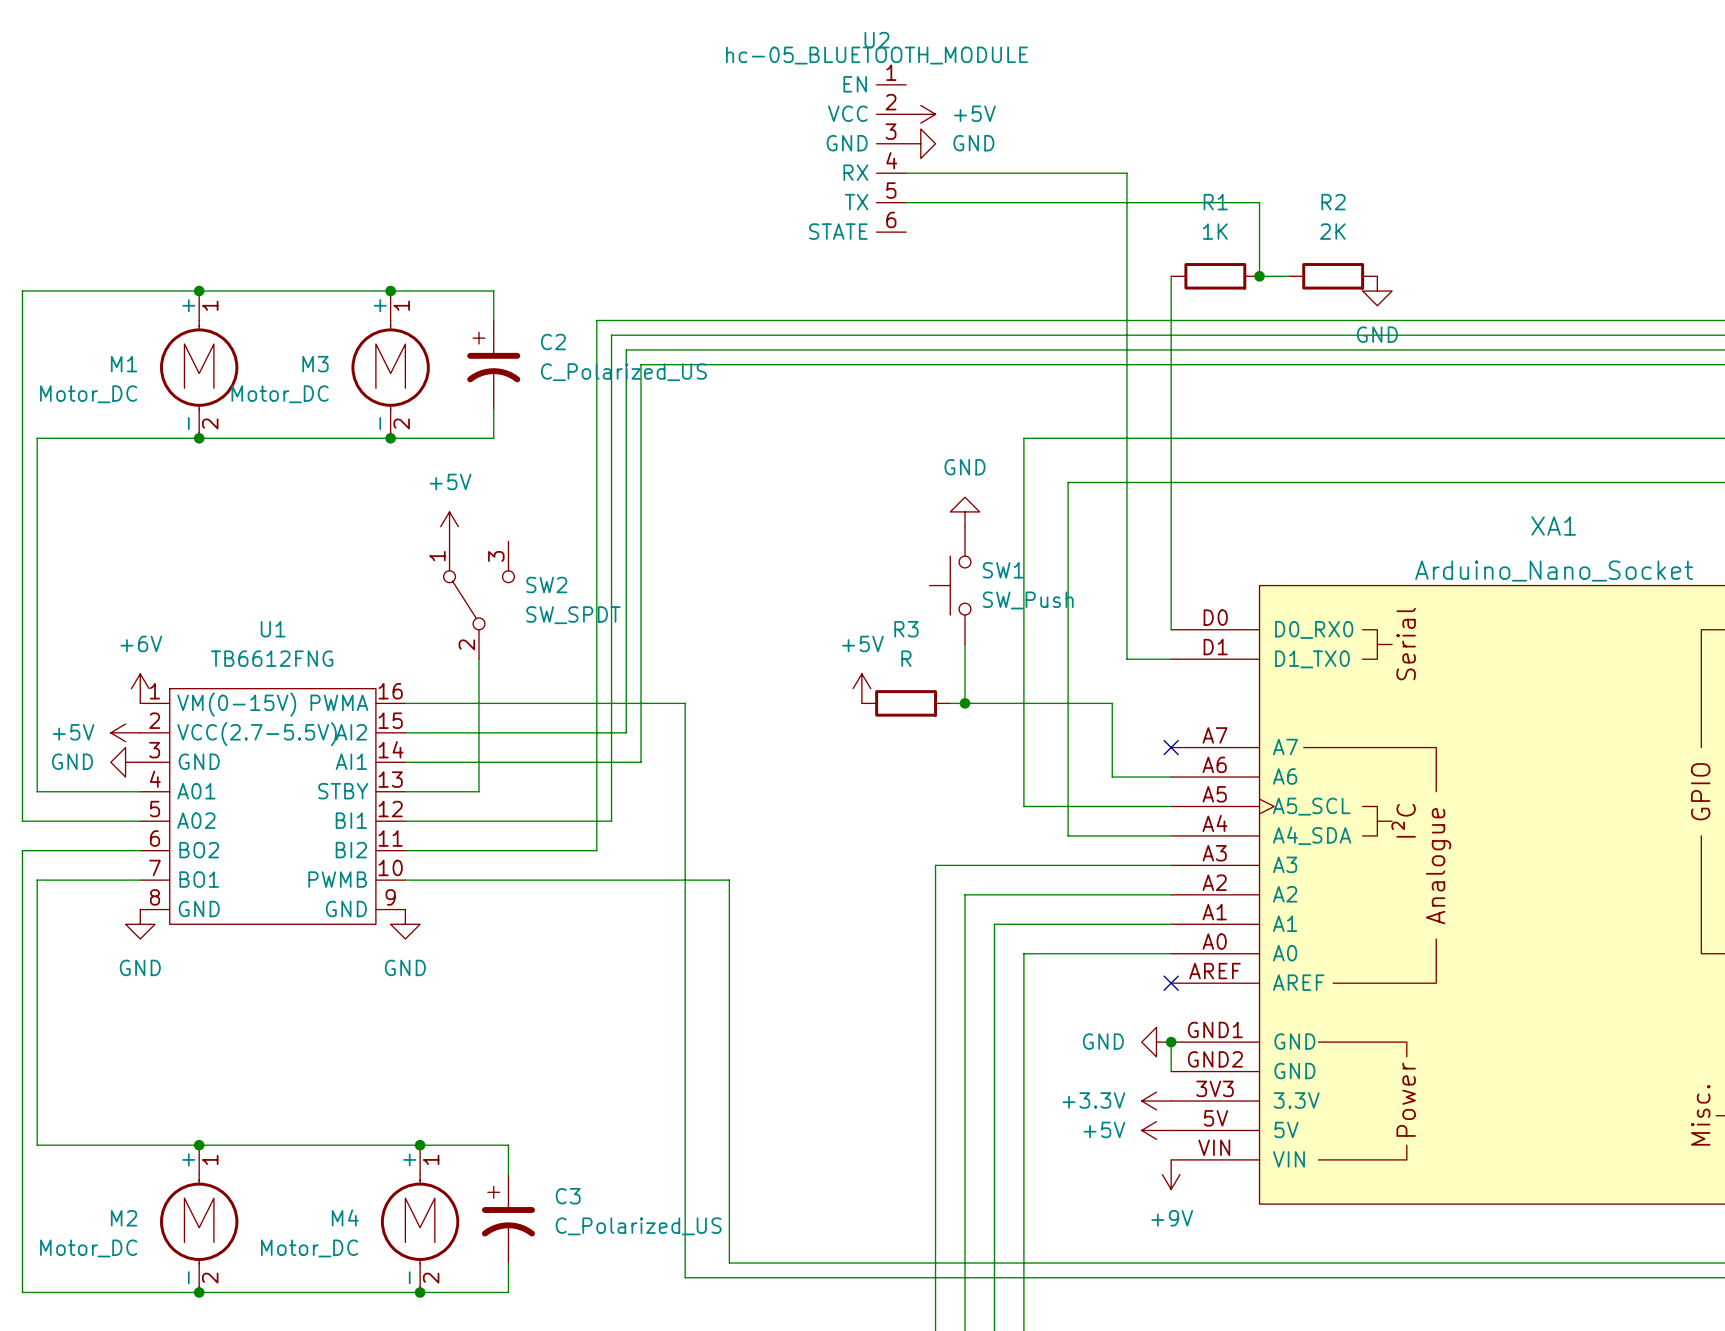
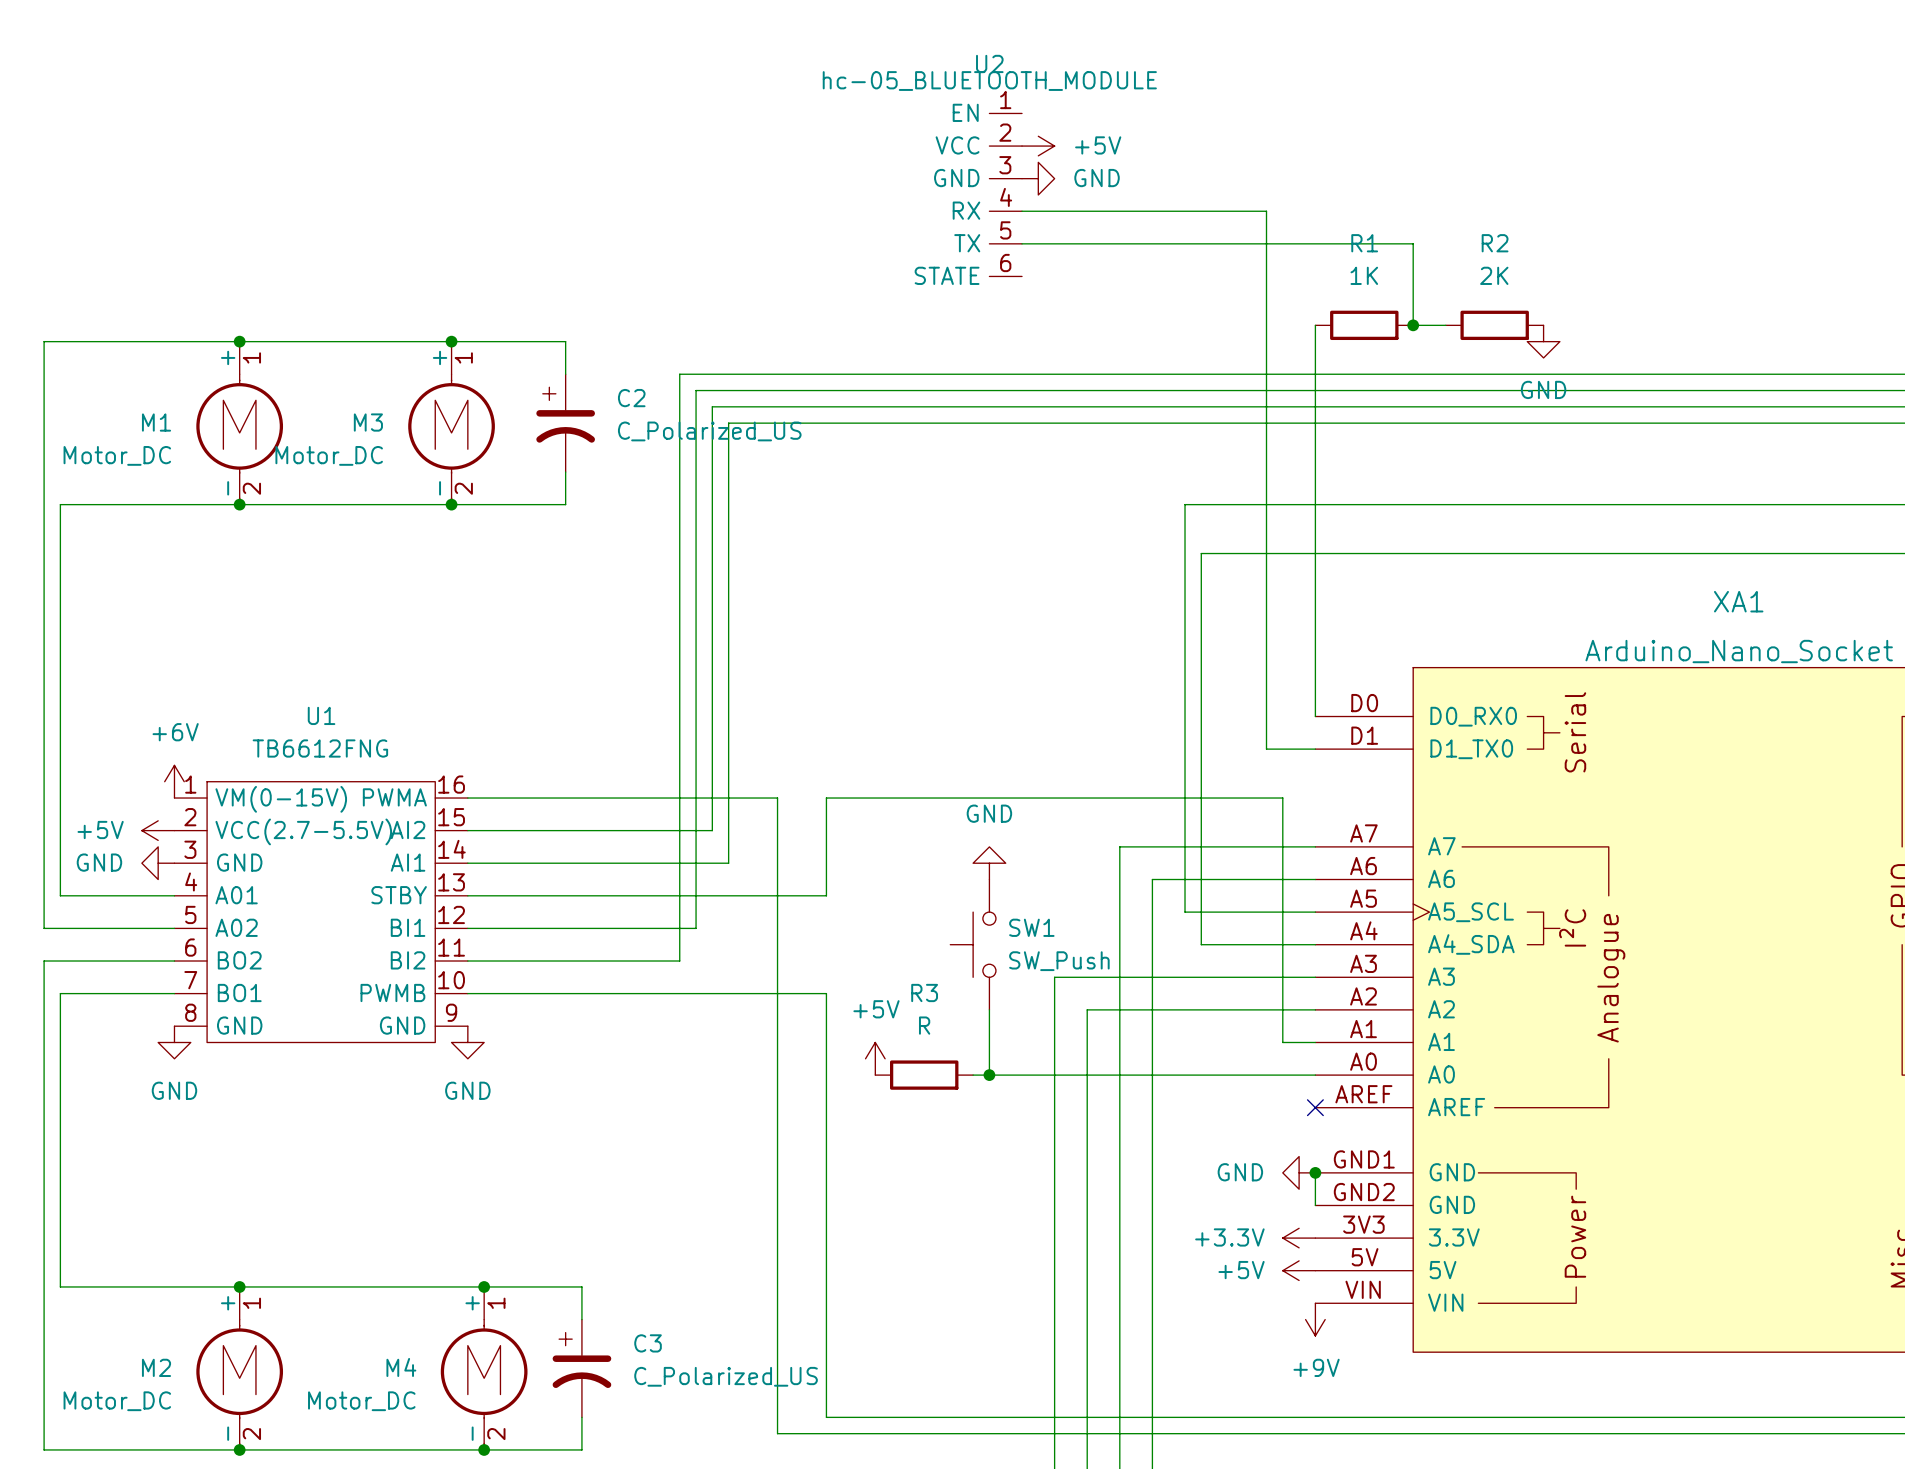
wire: (1053, 438) (1023, 438) (1023, 777) -> (1185, 504) (1185, 912)
power symbol position: GND (964, 511) -> GND (989, 863)
power symbol: +5V (449, 526) -> none
SW1 position: (950, 585) -> (973, 944)
SW2: SW_SPDT (479, 600) -> none
wire: (964, 644) (964, 703) -> (989, 1009) (989, 1075)
wire: (479, 659) (479, 791) -> (1070, 798) (826, 798) (826, 895) (549, 895)
power symbol: +5V (861, 688) -> none
R3 position: (906, 703) -> (924, 1075)
junction: (964, 703) -> none
wire: (1112, 703) (1112, 777) -> (1152, 879) (1250, 879)
wire: none -> (1250, 798) (1282, 798) (1282, 1042)
no-connect mark: (1171, 747) -> none
wire: (1023, 806) (1053, 806) -> (1152, 912) (1152, 1075) (973, 1075)
wire: (994, 924) (1141, 924) -> (1119, 1042) (1119, 846) (1315, 846)
power symbol: none -> +5V (875, 1058)
junction: none -> (989, 1075)

